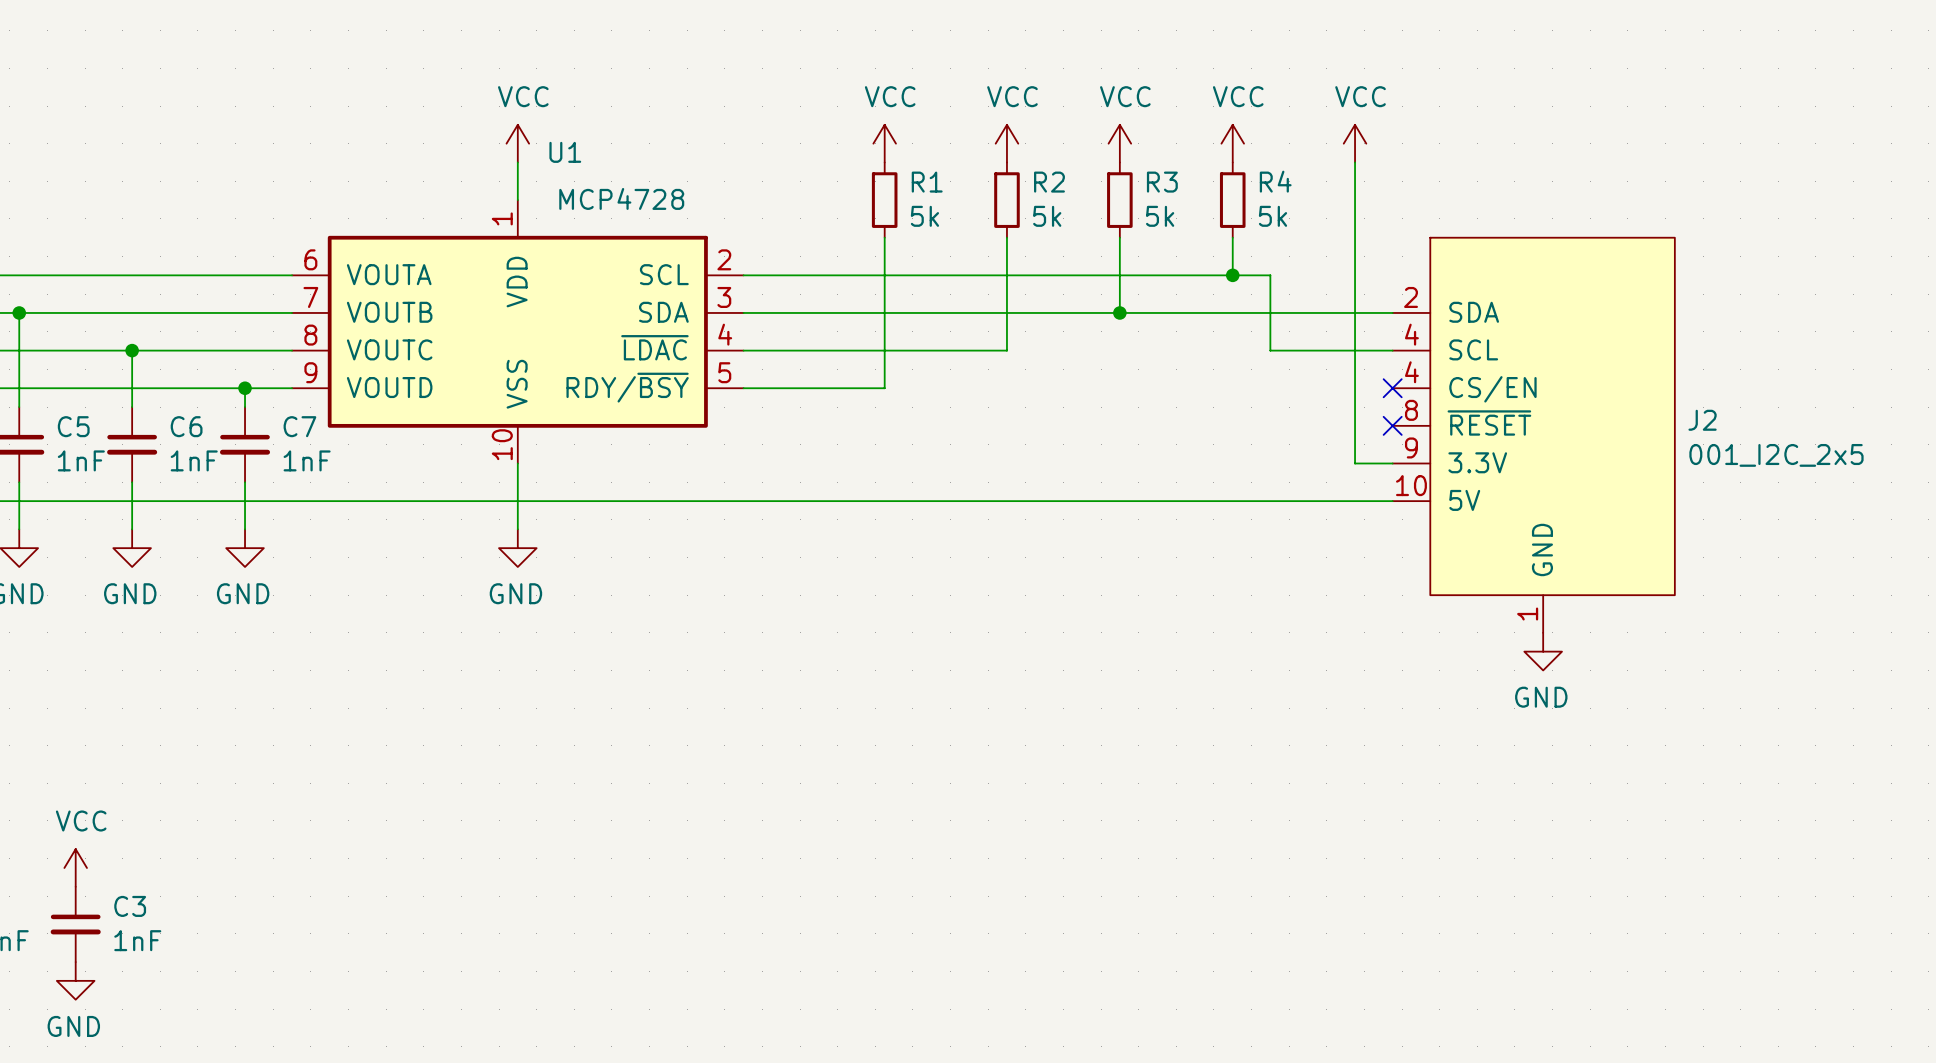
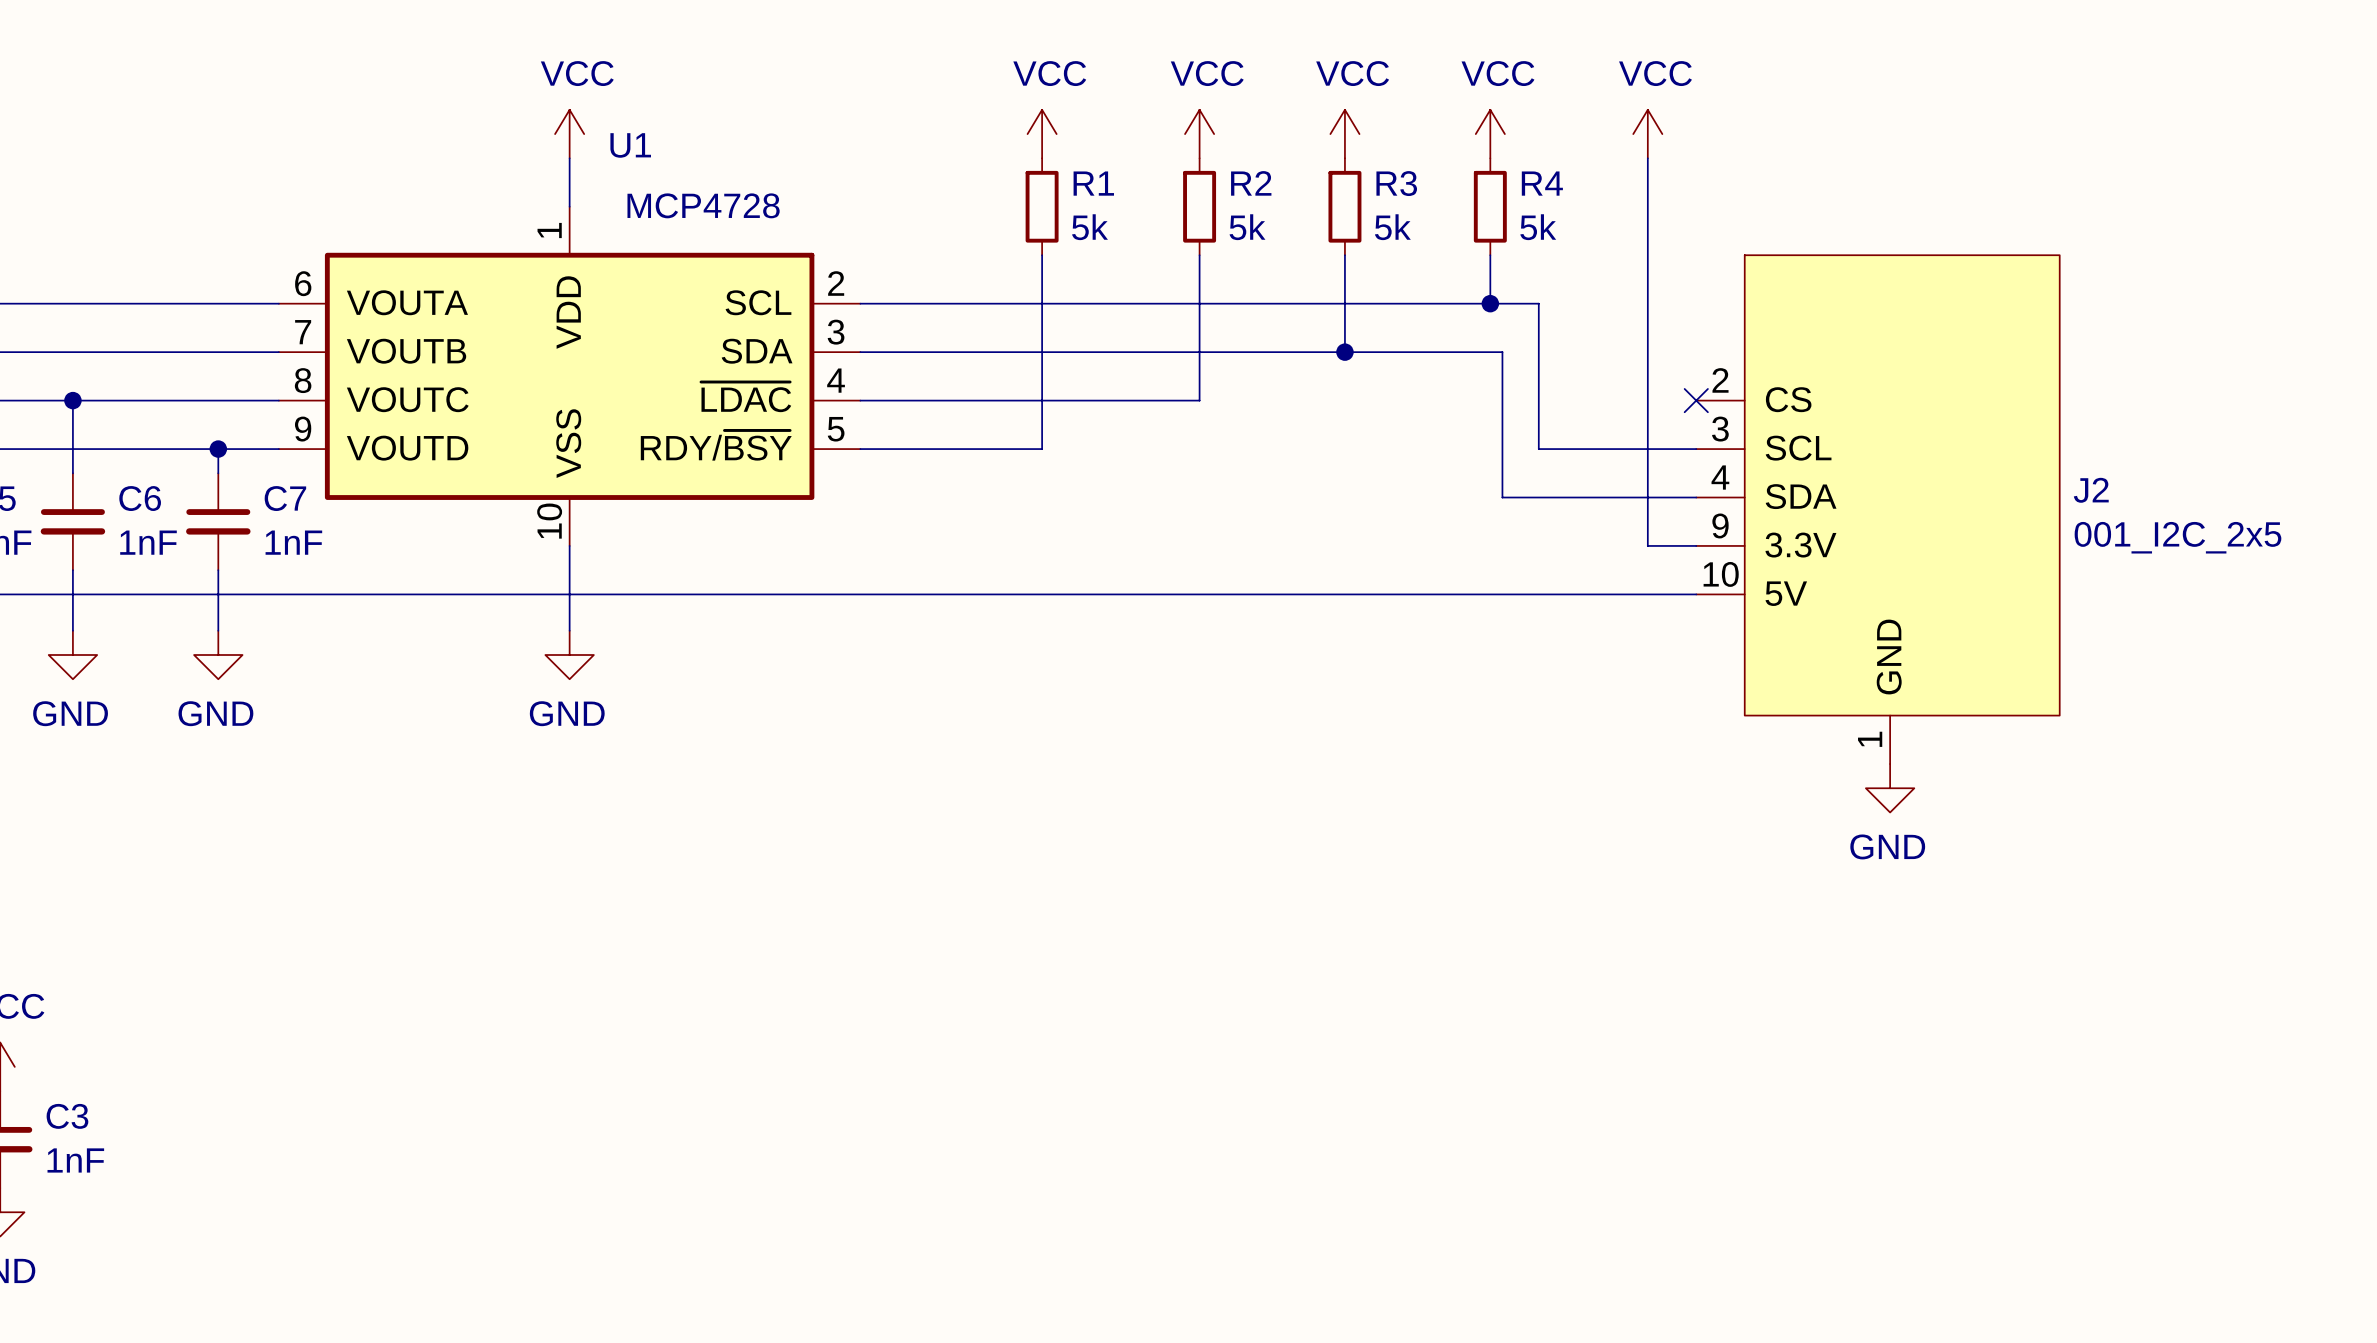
J2 symbol: [1392, 237, 1675, 633] -> [1696, 255, 2060, 765]
wire: (1242, 312) (1392, 312) -> (1502, 352) (1502, 497) (1696, 497)
wire: (1270, 350) (1392, 350) -> (1538, 400) (1538, 449) (1696, 449)
no-connect mark: none -> (1696, 400)
no-connect mark: (1392, 388) -> none
no-connect mark: (1392, 425) -> none

